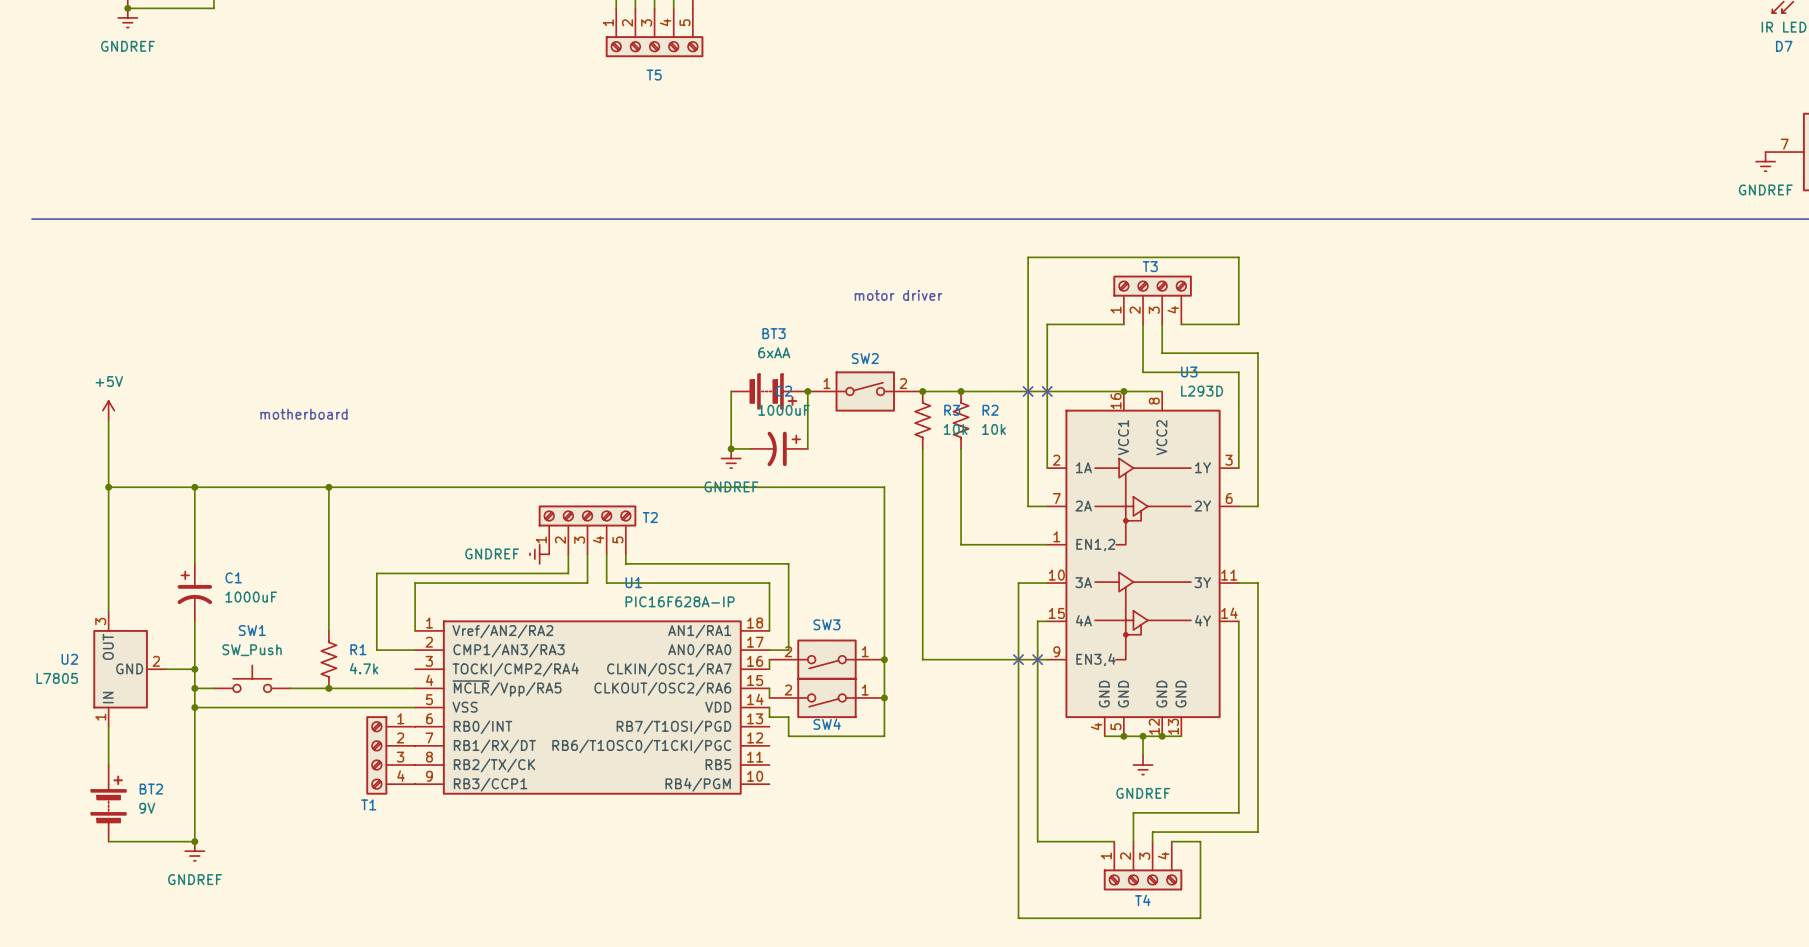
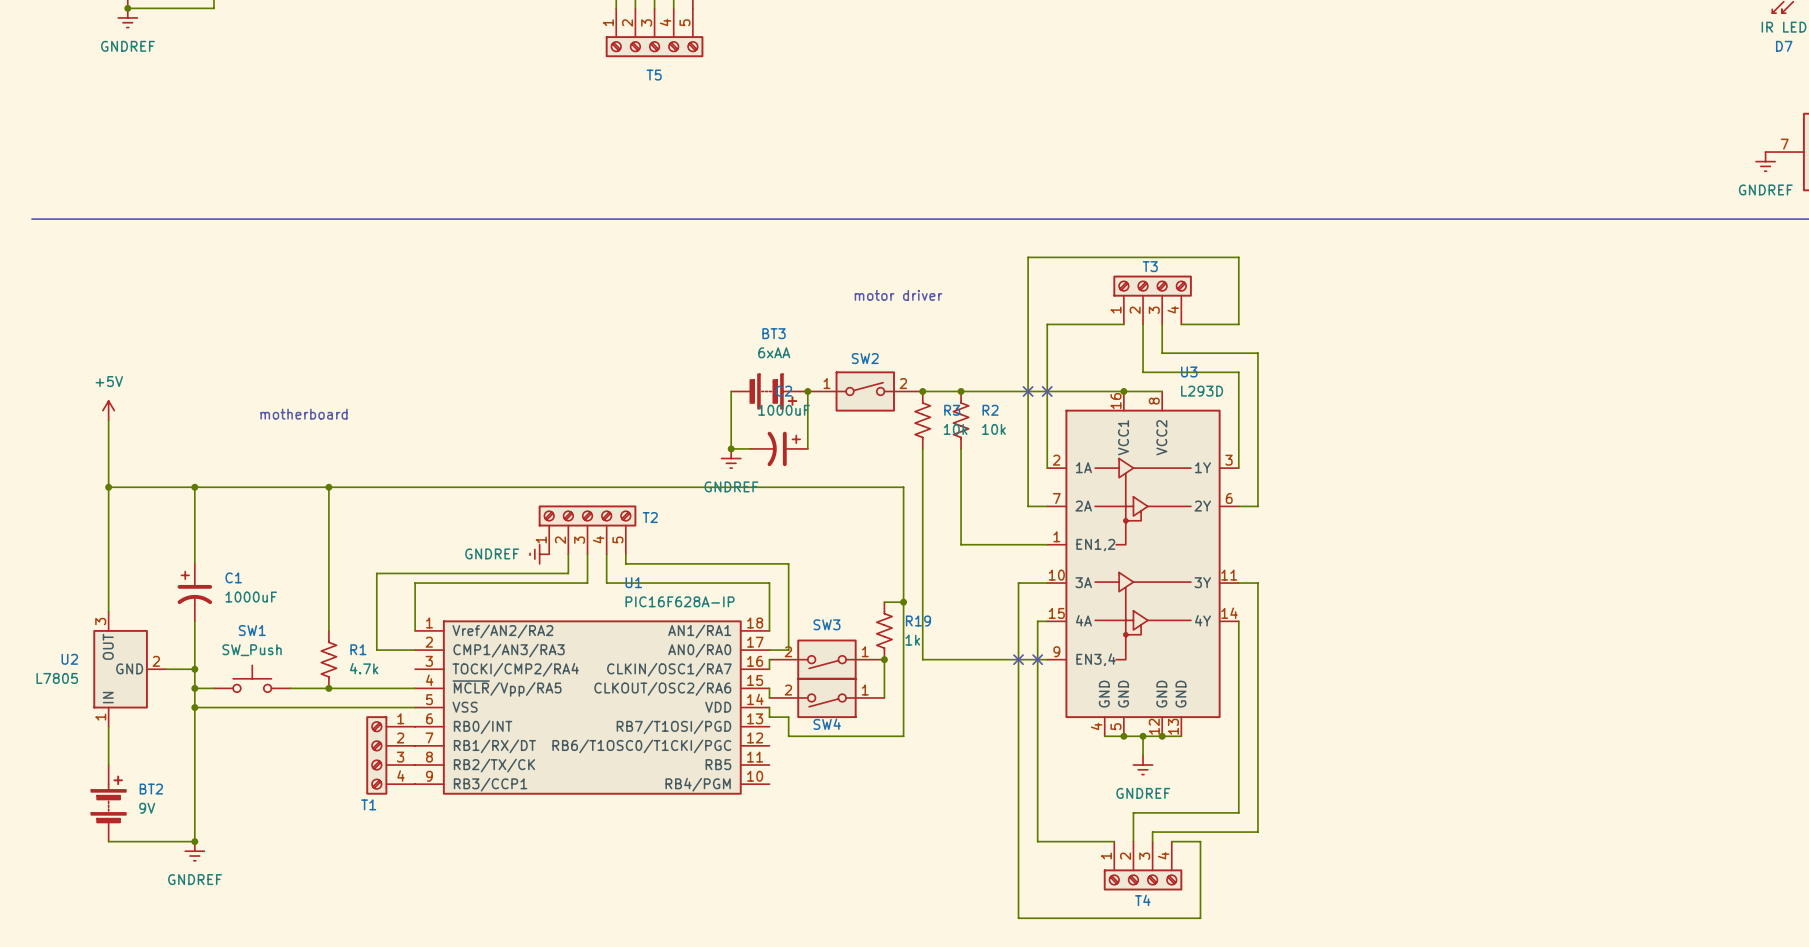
wire: (884, 487) (884, 659) -> (884, 487) (903, 487) (903, 736) (884, 736)
wire: none -> (884, 602) (903, 602)
junction: none -> (903, 602)
R19: none -> 1k (884, 630)
wire: (884, 697) (884, 736) -> none
junction: (884, 697) -> none

